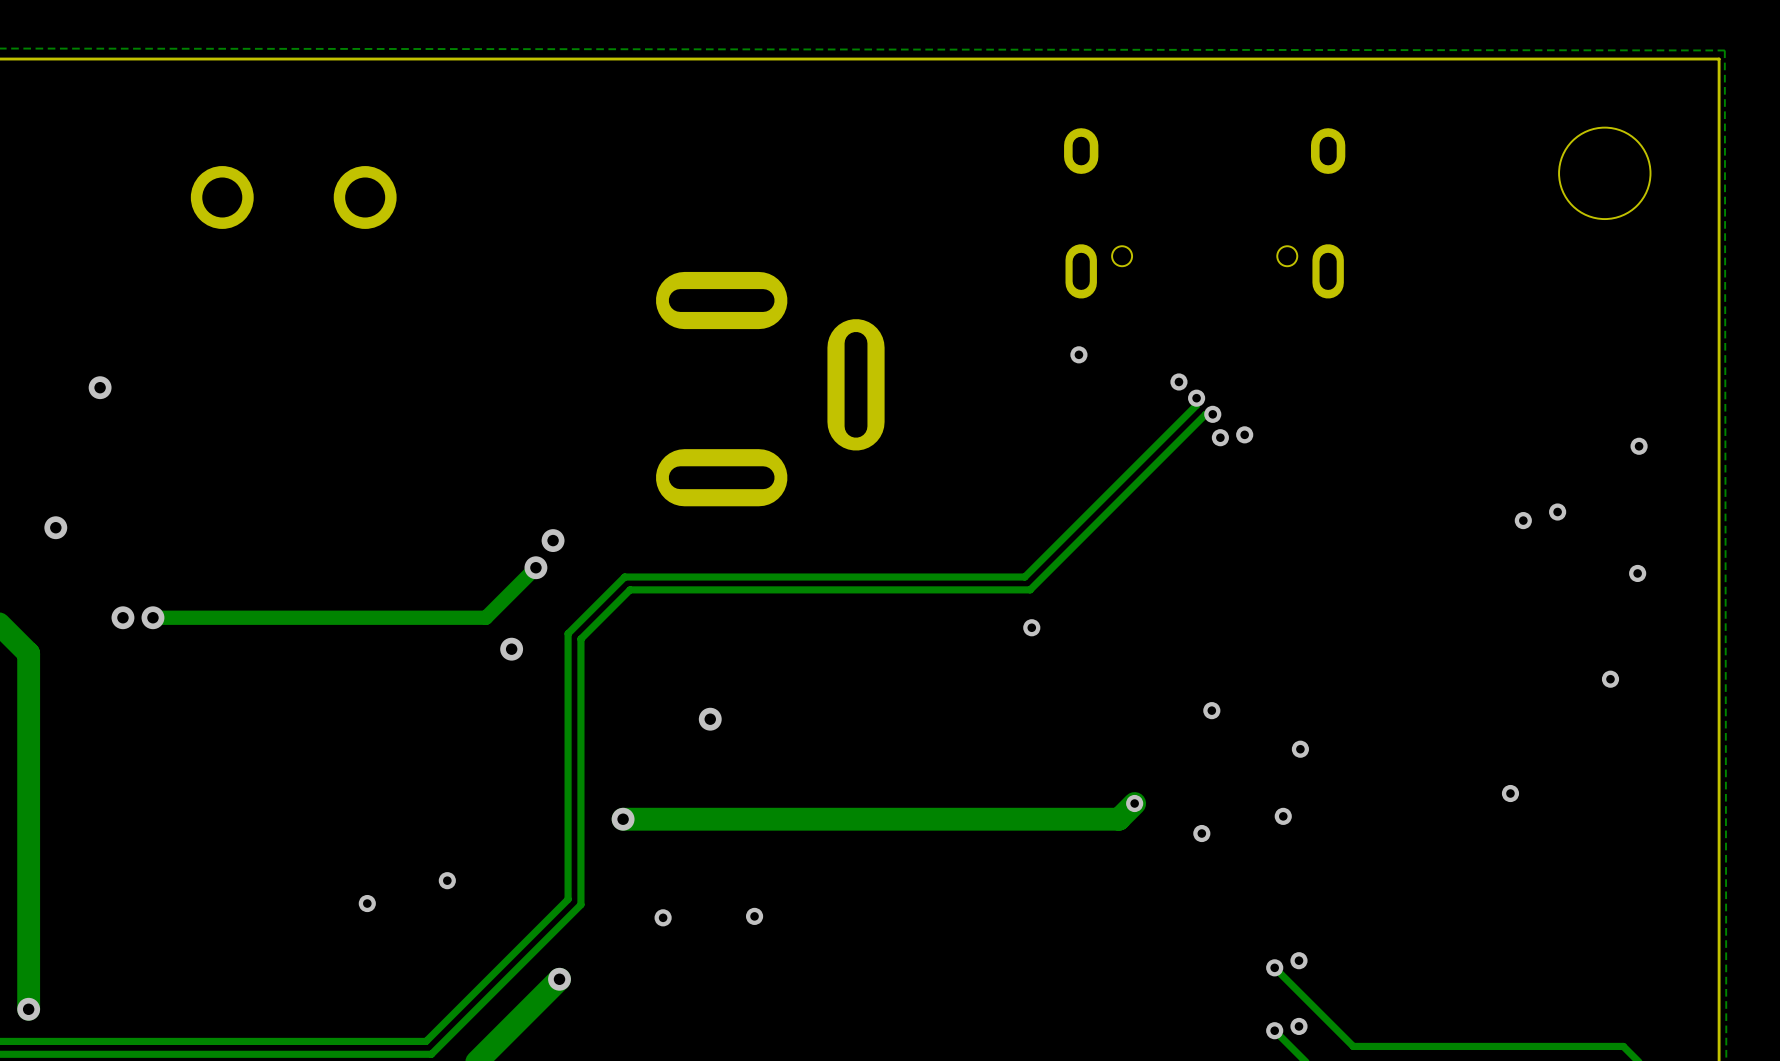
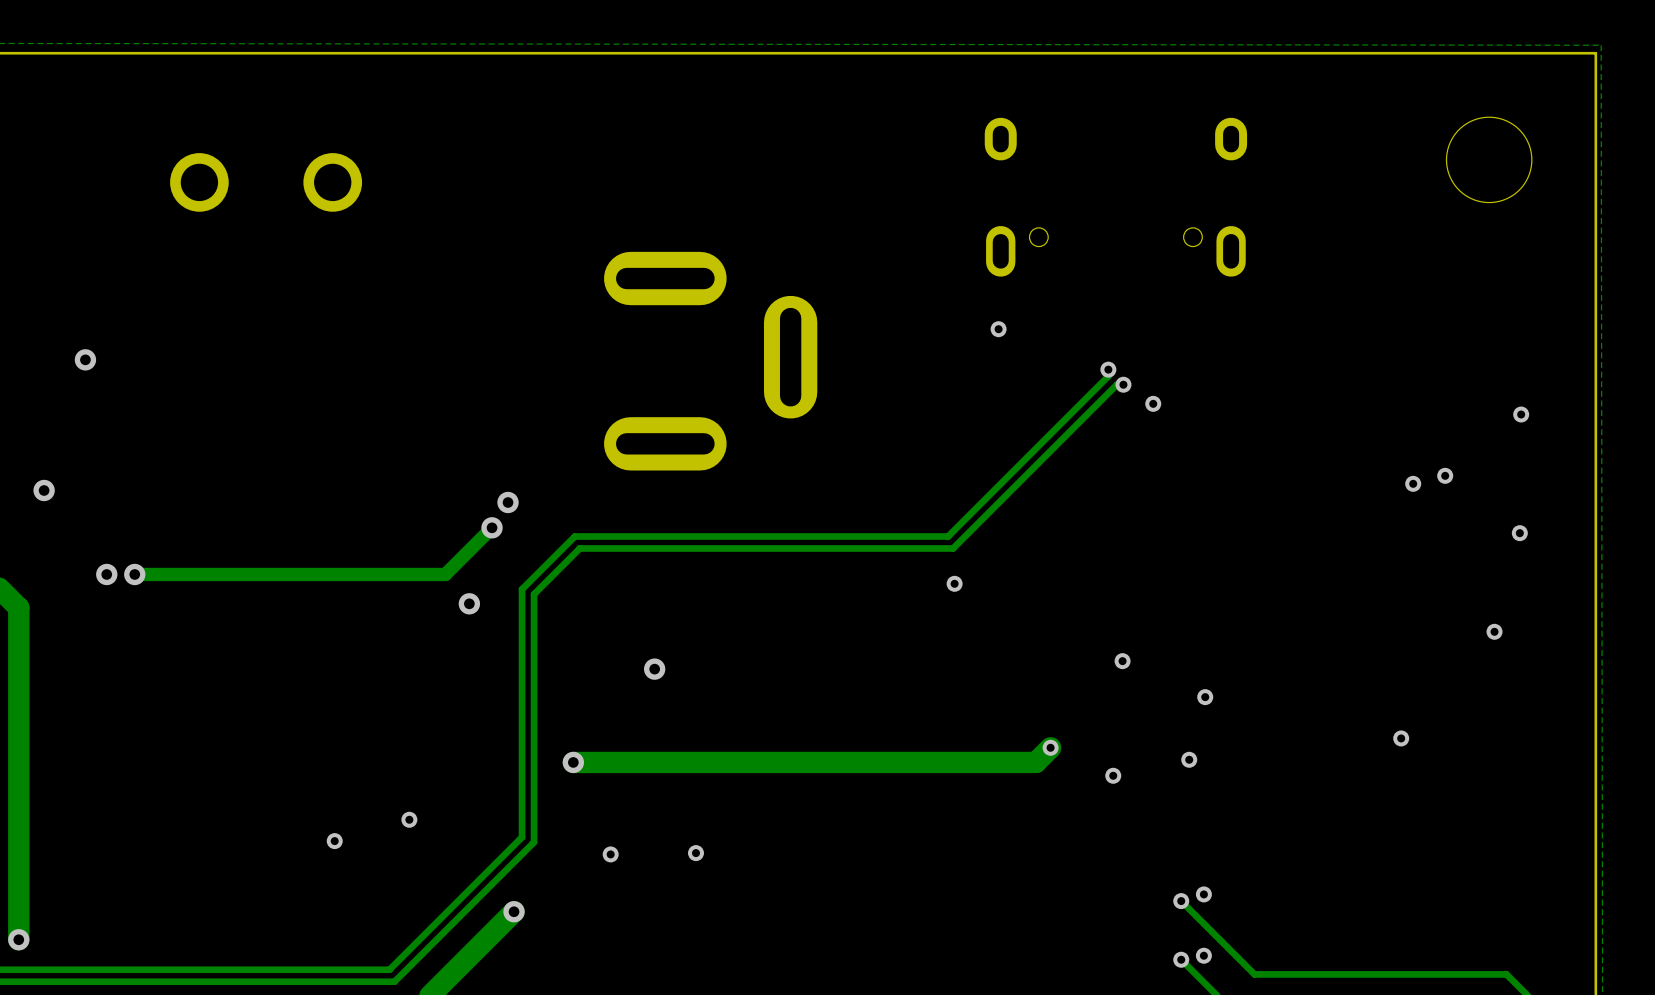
via: (1178, 381) -> none
via: (1220, 437) -> none

